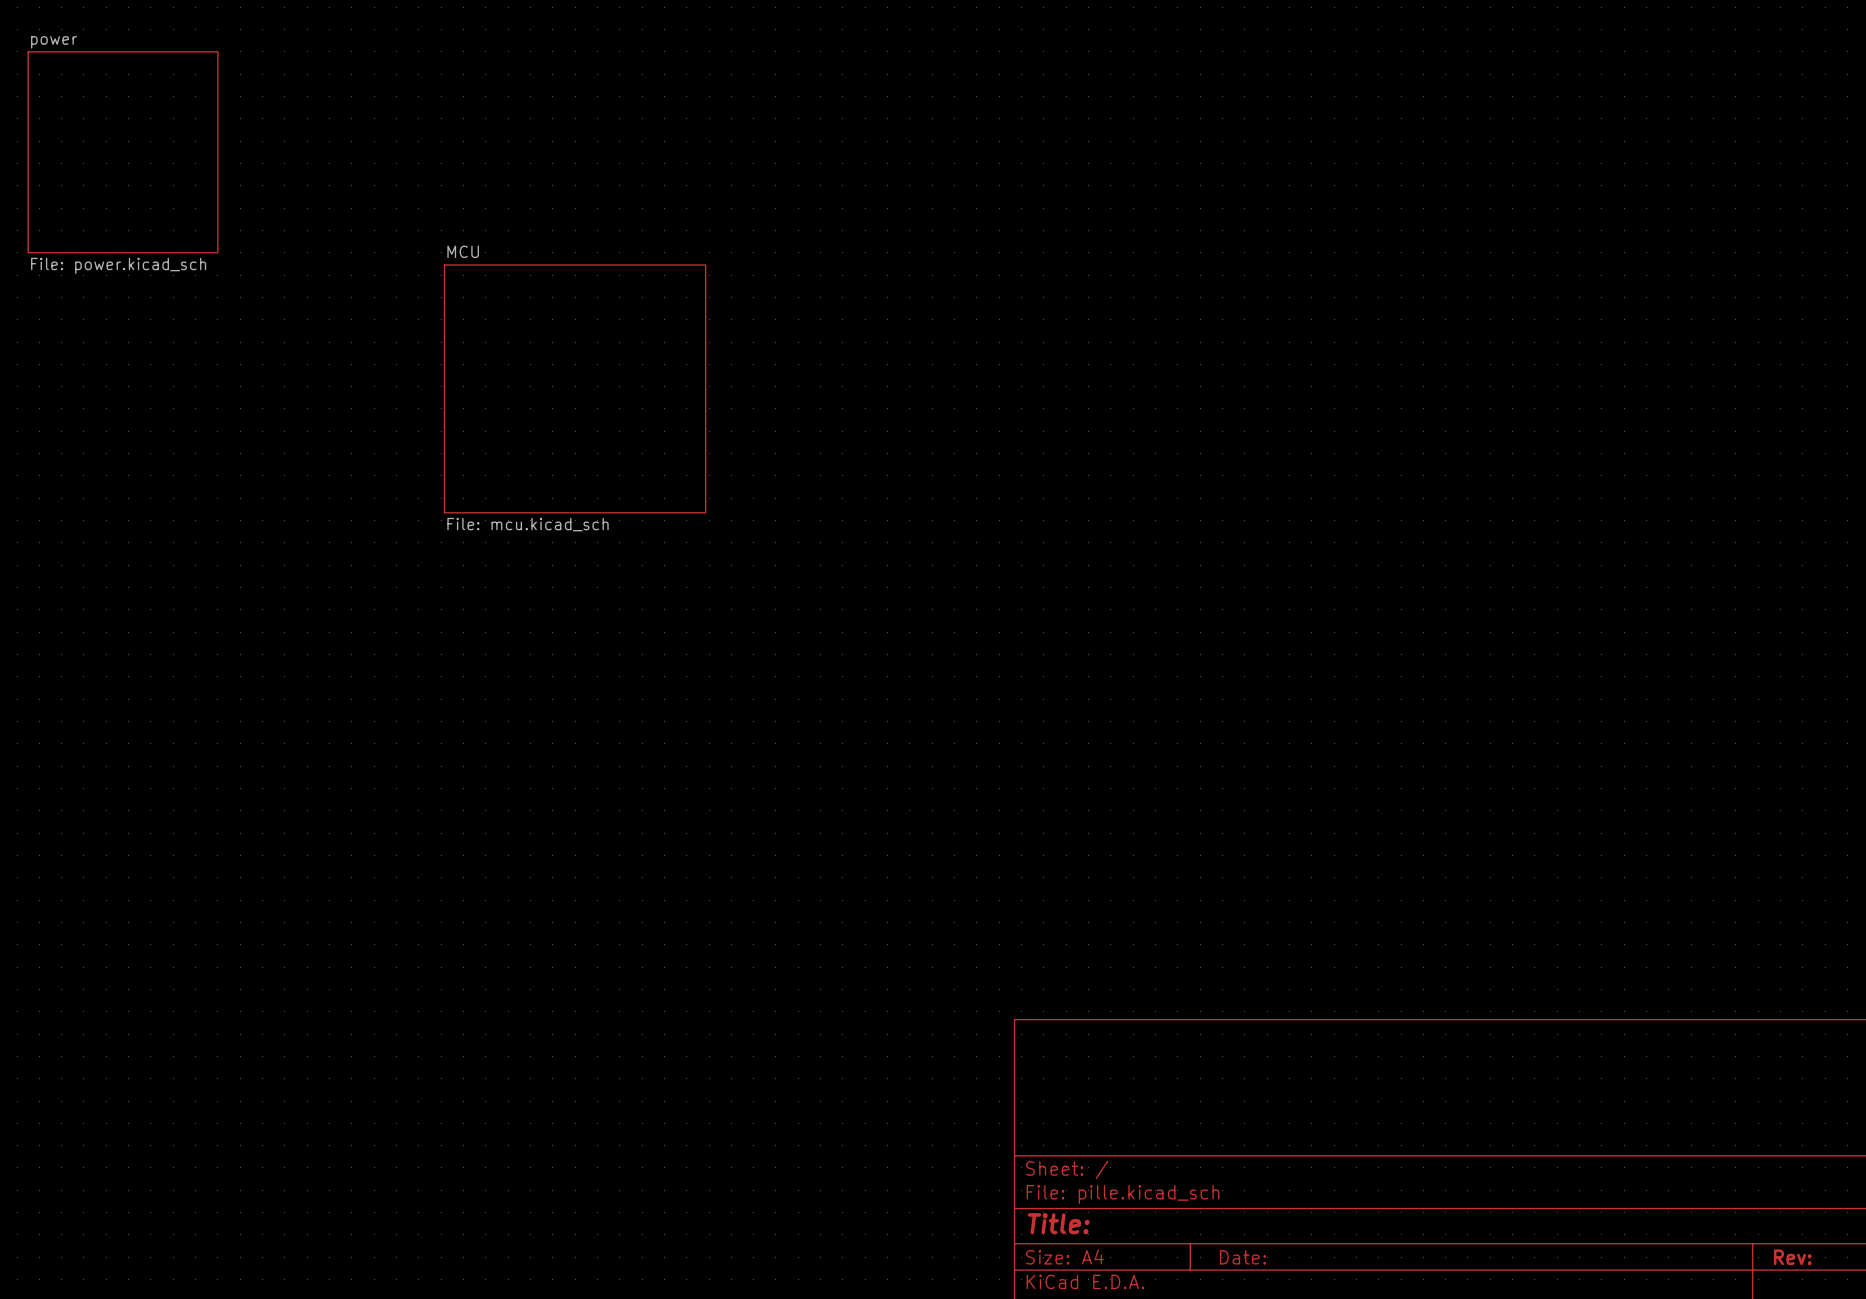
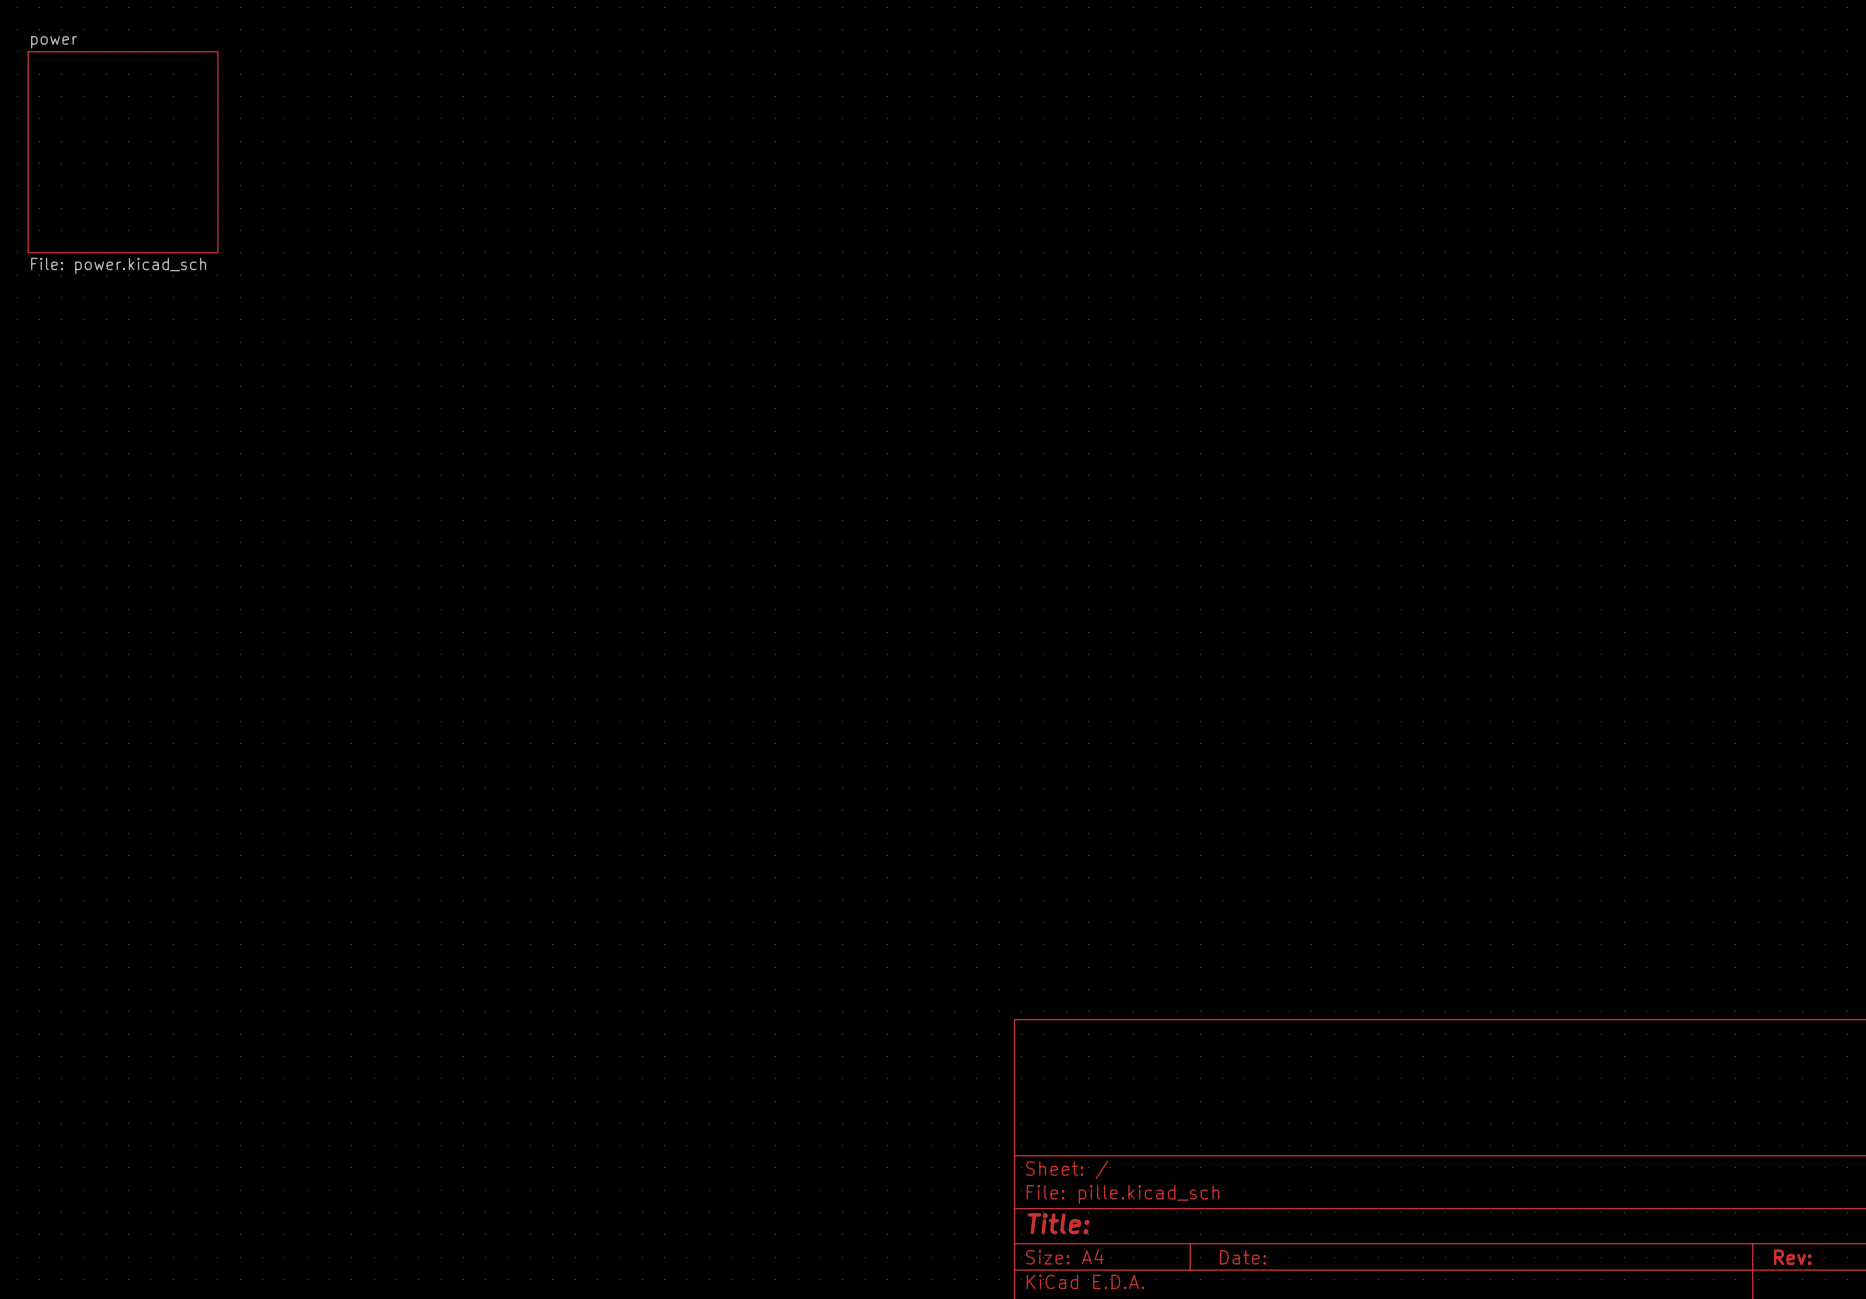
sheet MCU: File: mcu.kicad_sch (575, 388) -> none

